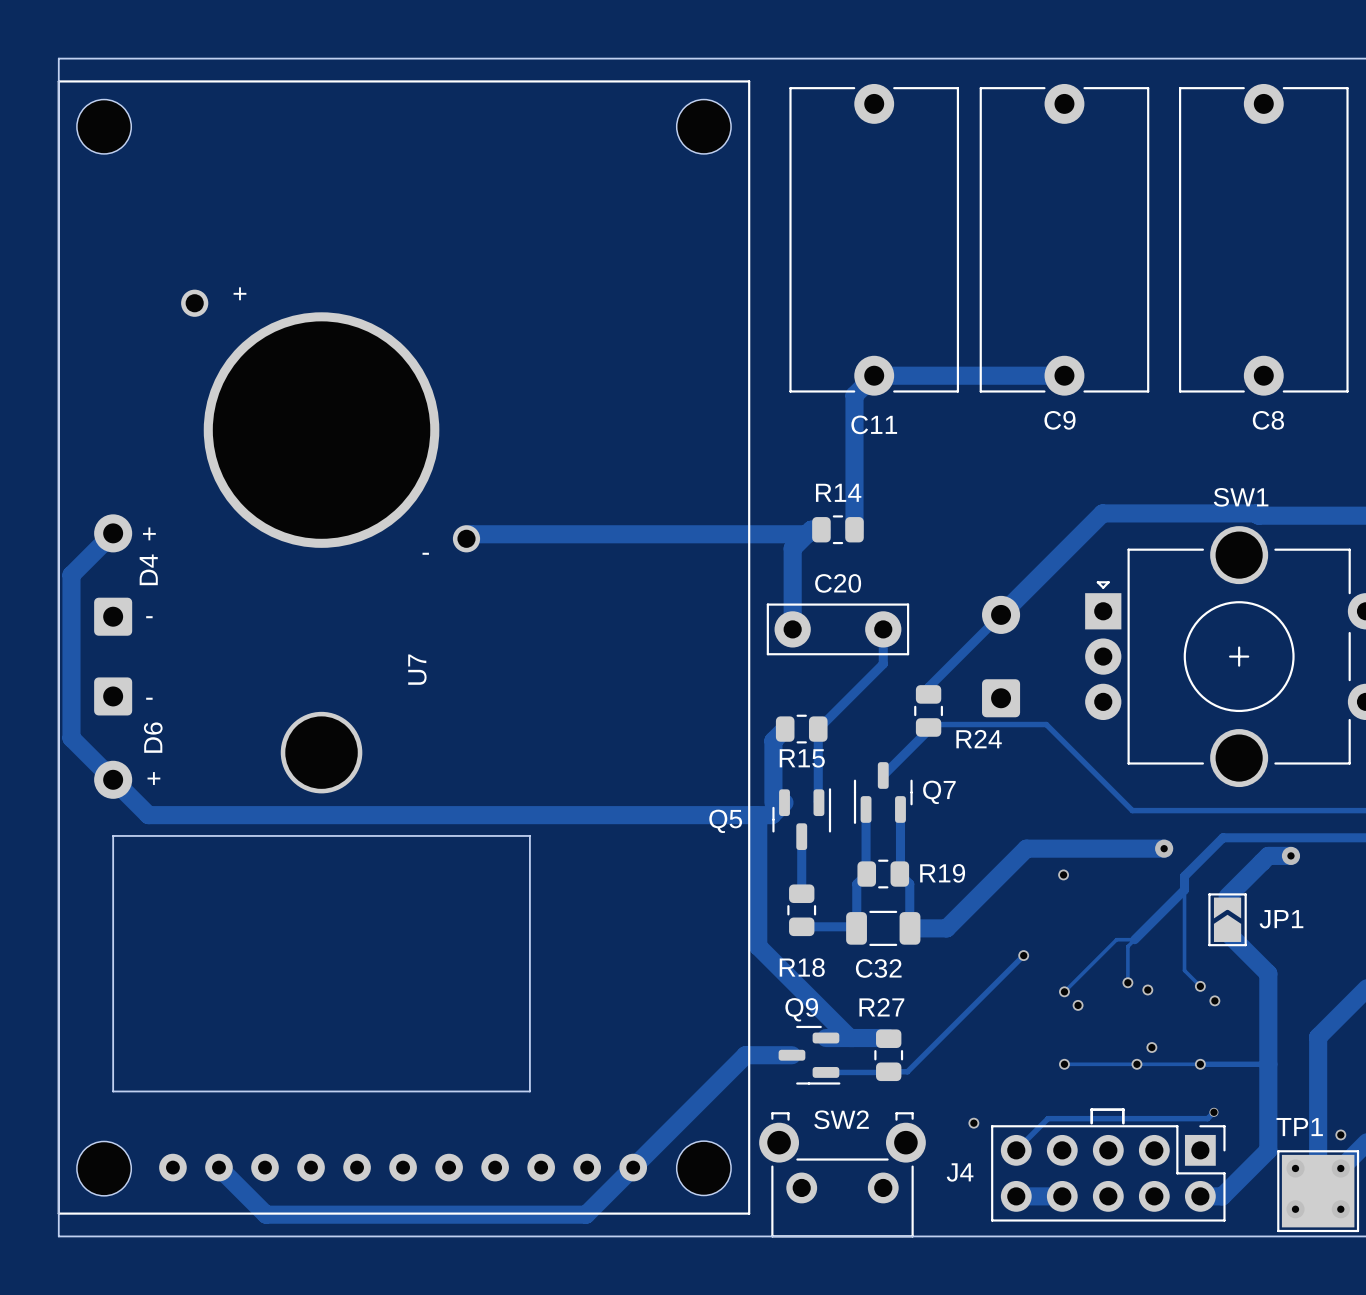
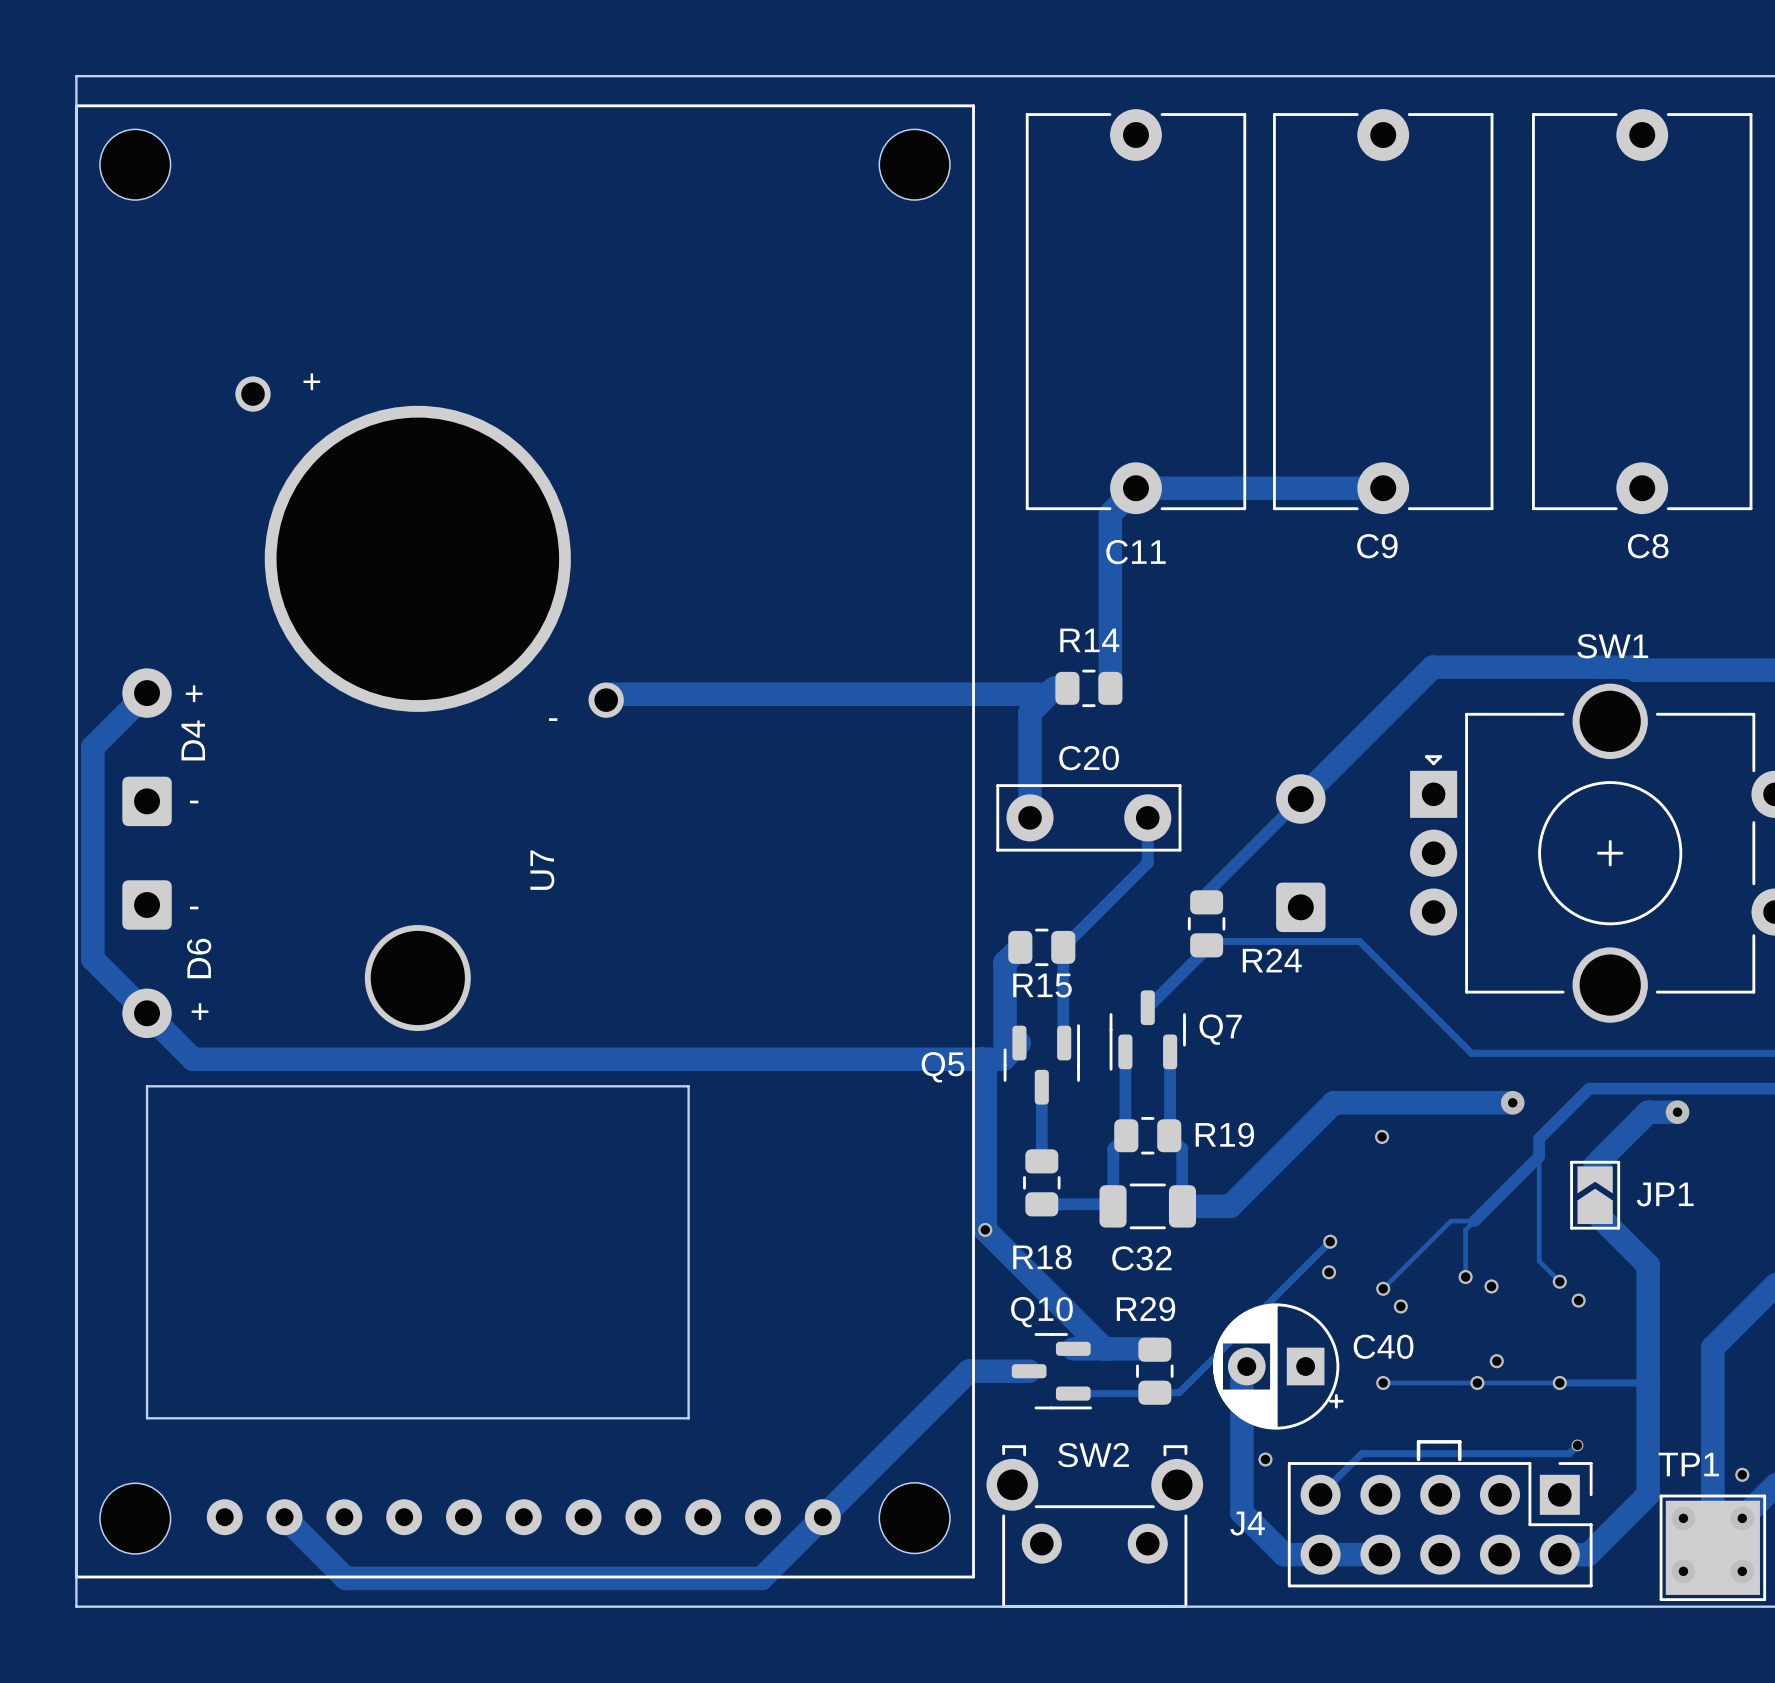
via: none -> (985, 1229)
via: none -> (1329, 1272)
R27 name: R27 (881, 1007) -> R29 (1145, 1309)
Q9 name: Q9 (801, 1009) -> Q10 (1041, 1312)
track: none -> (1246, 1366) (1241, 1371) (1241, 1512) (1284, 1554) (1320, 1554)
C40: none -> (1278, 1366)

